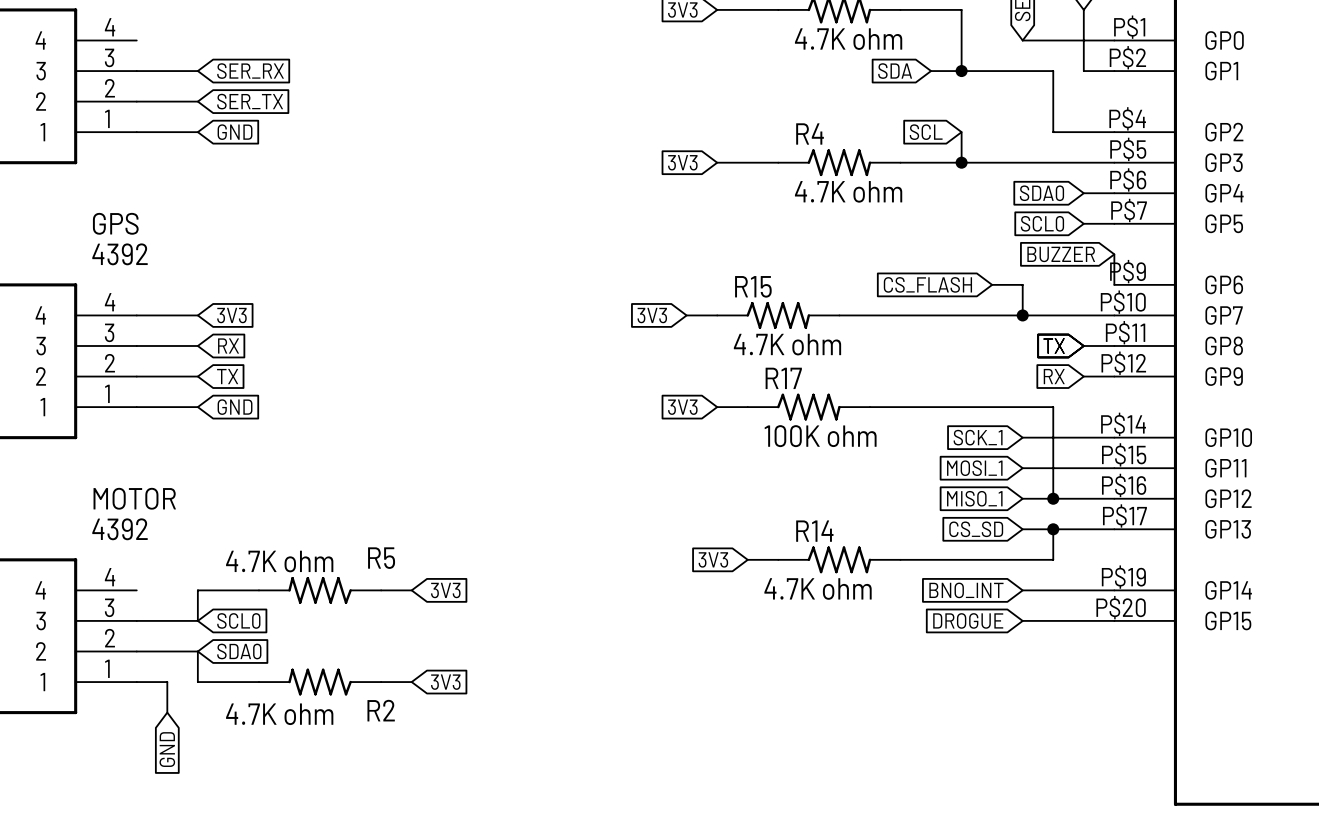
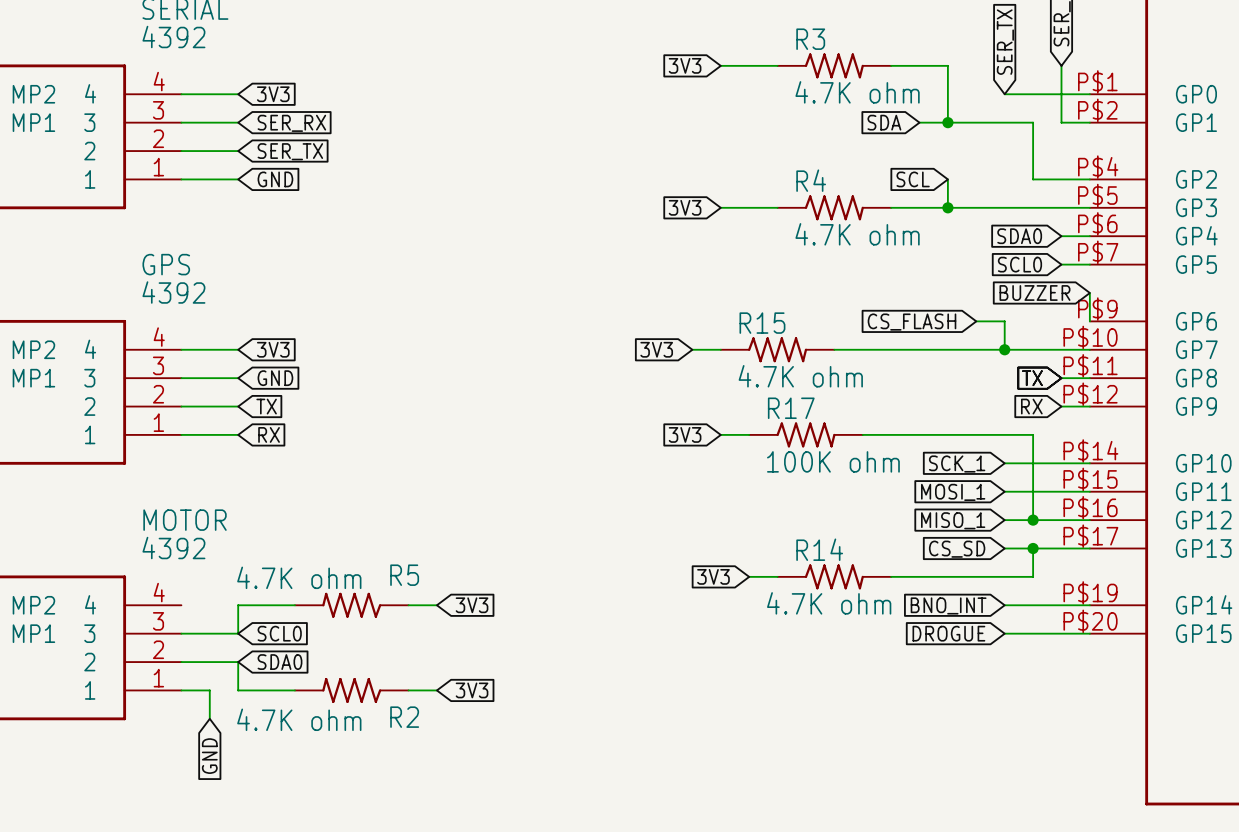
wire: none -> (181, 94) (238, 94)
global label: none -> 3V3 (273, 94)
global label: RX (228, 345) -> GND (275, 378)
global label: GND (235, 407) -> RX (269, 434)

